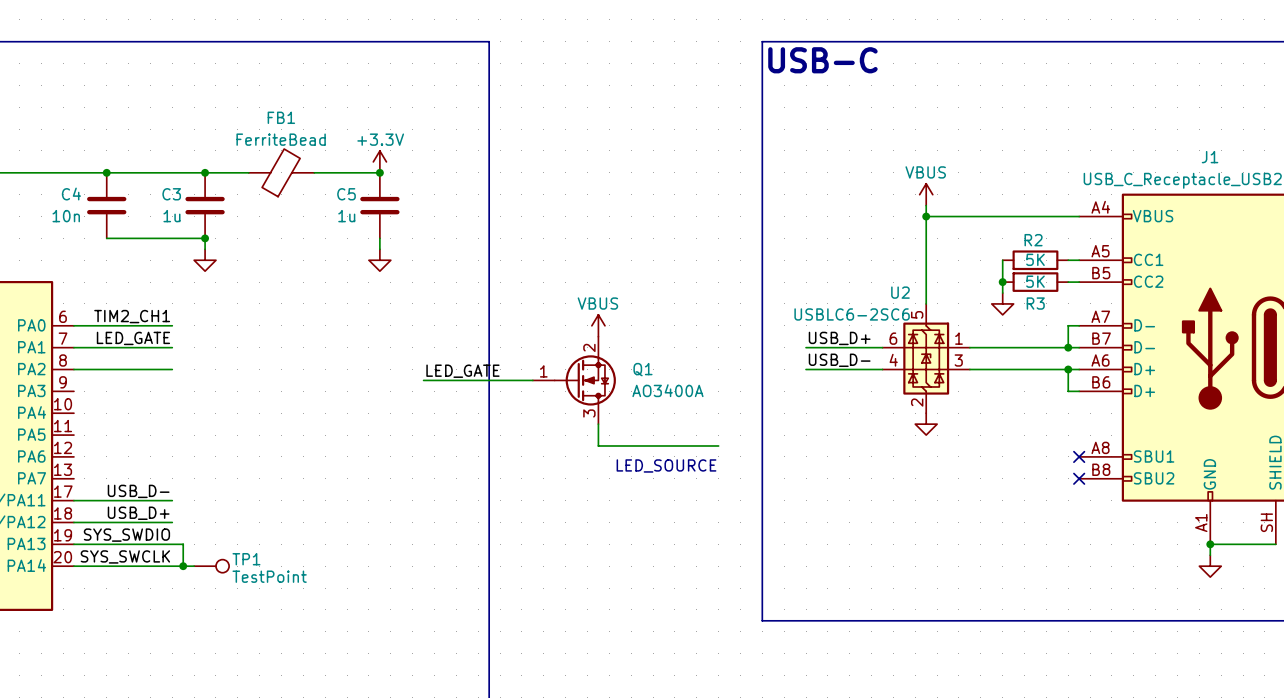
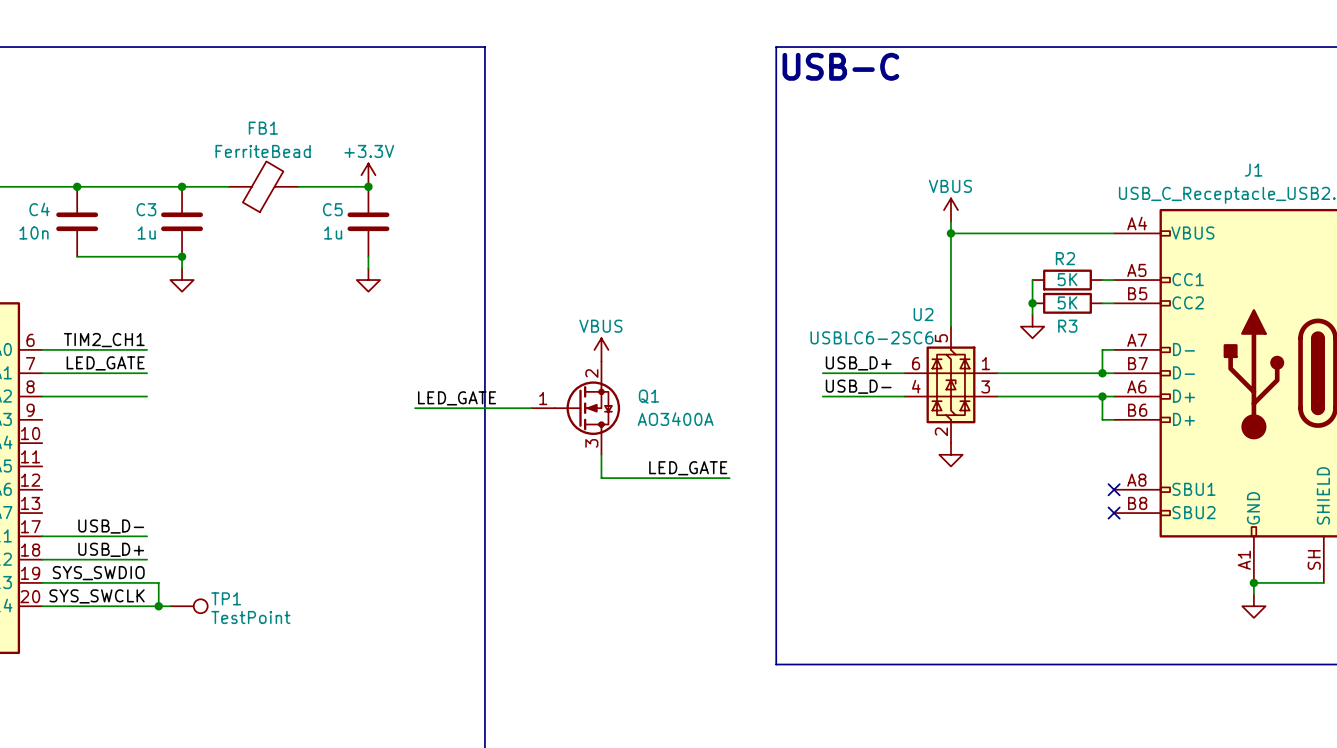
label: none -> LED_GATE (688, 468)
text: LED_SOURCE (666, 465) -> none

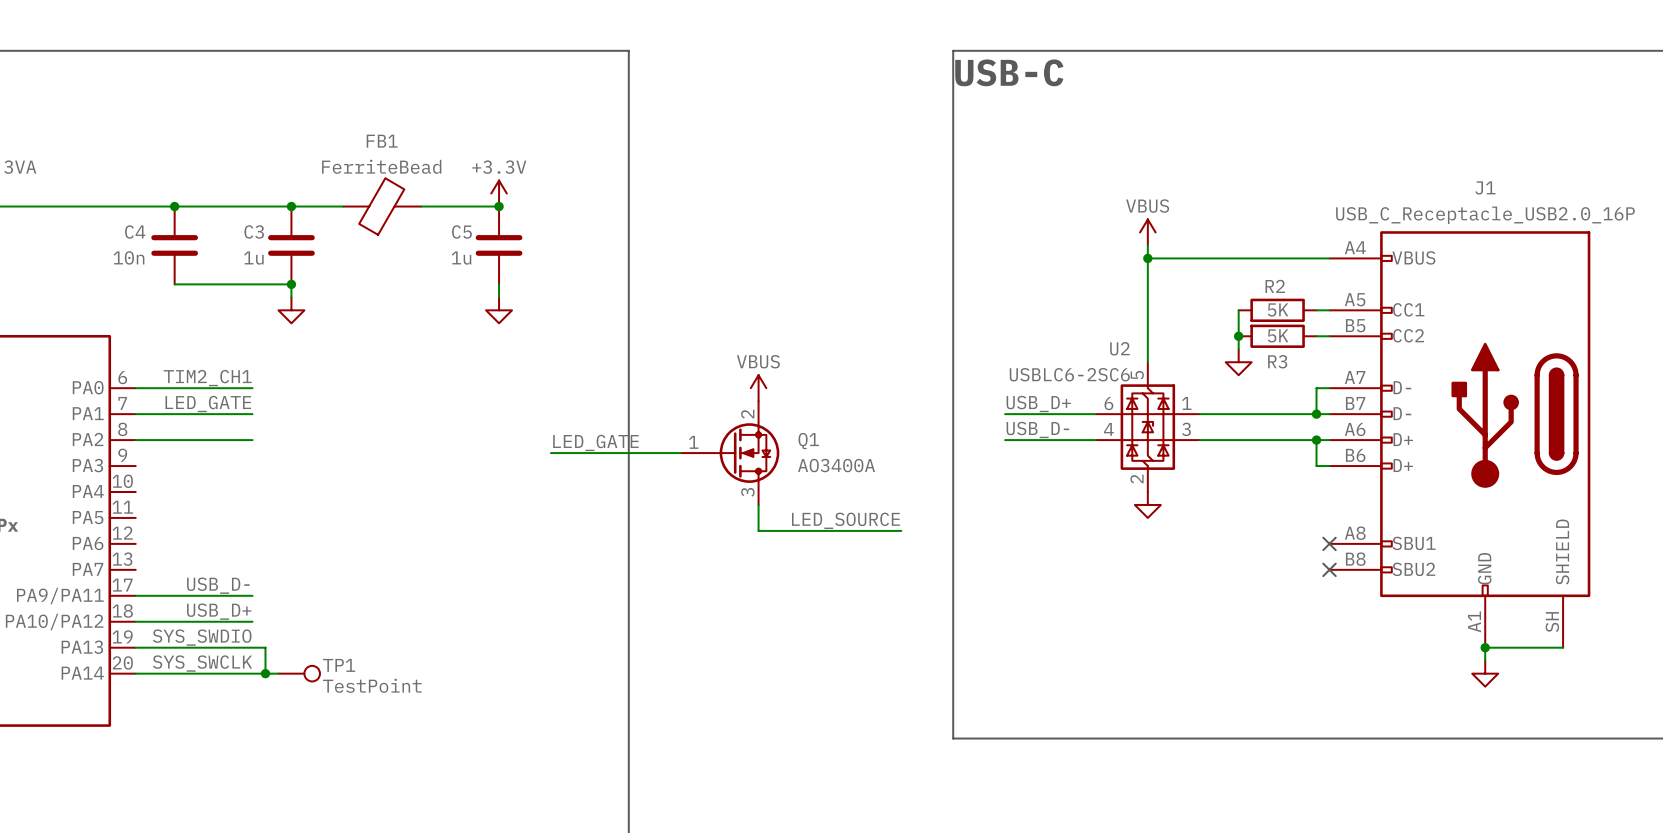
label: LED_GATE (688, 468) -> LED_SOURCE (845, 520)

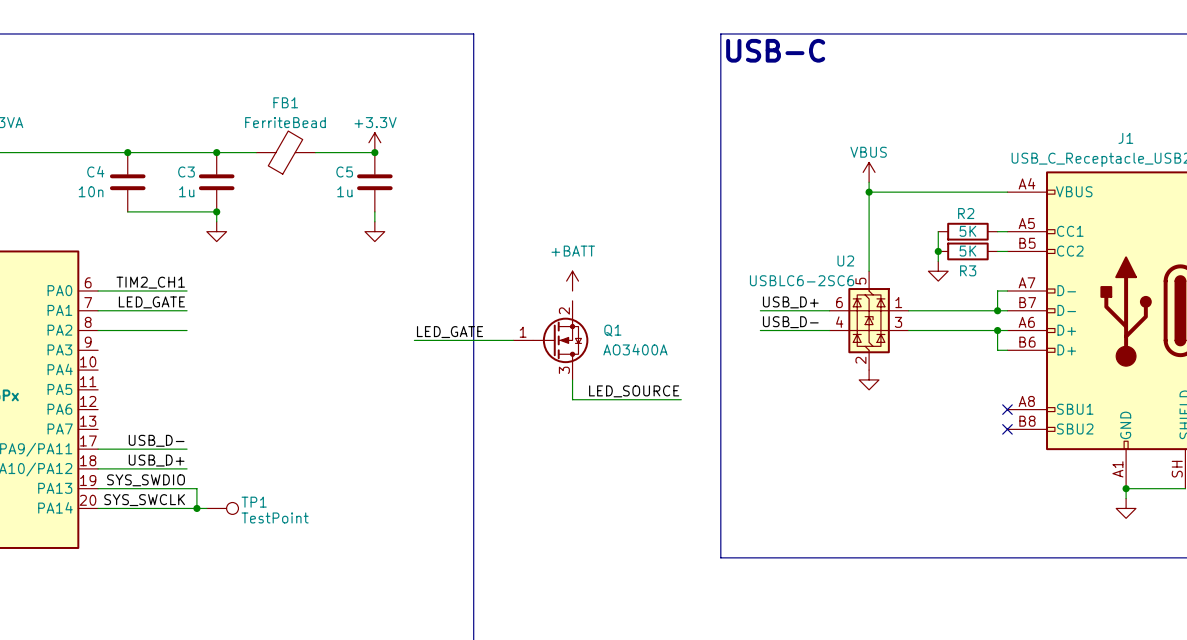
power symbol: none -> +BATT (572, 281)
power symbol: VBUS (758, 388) -> none

